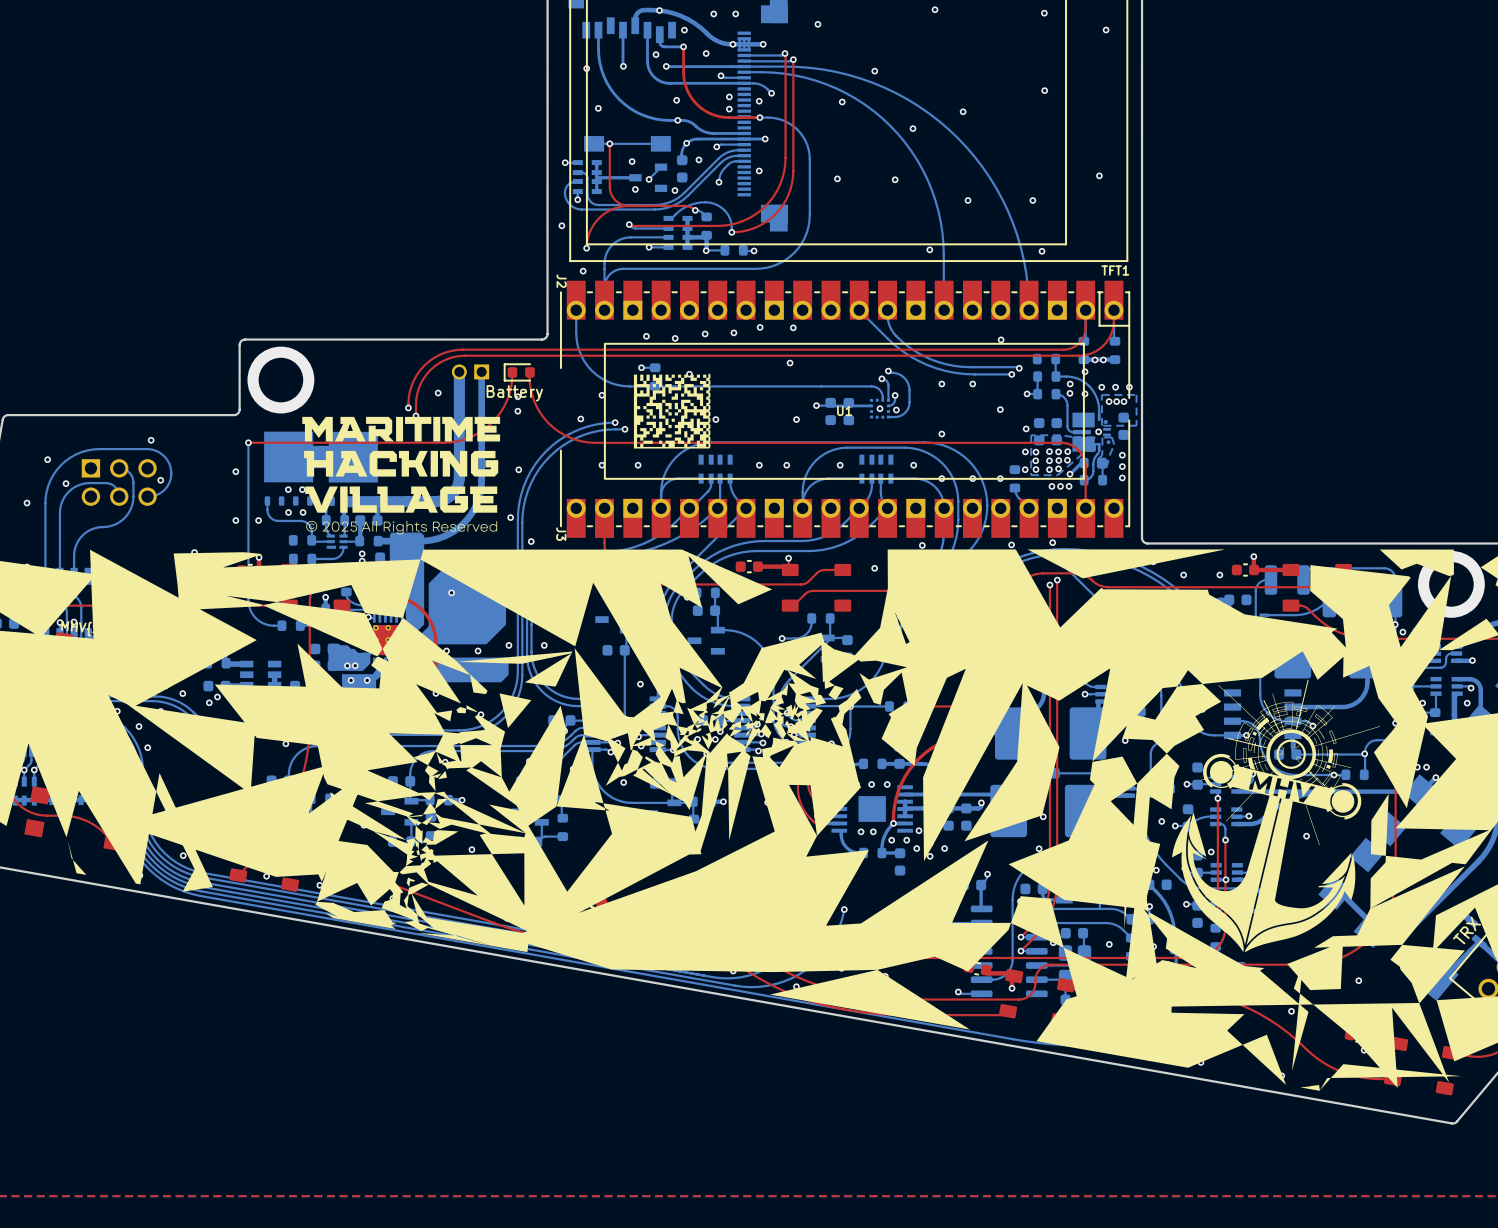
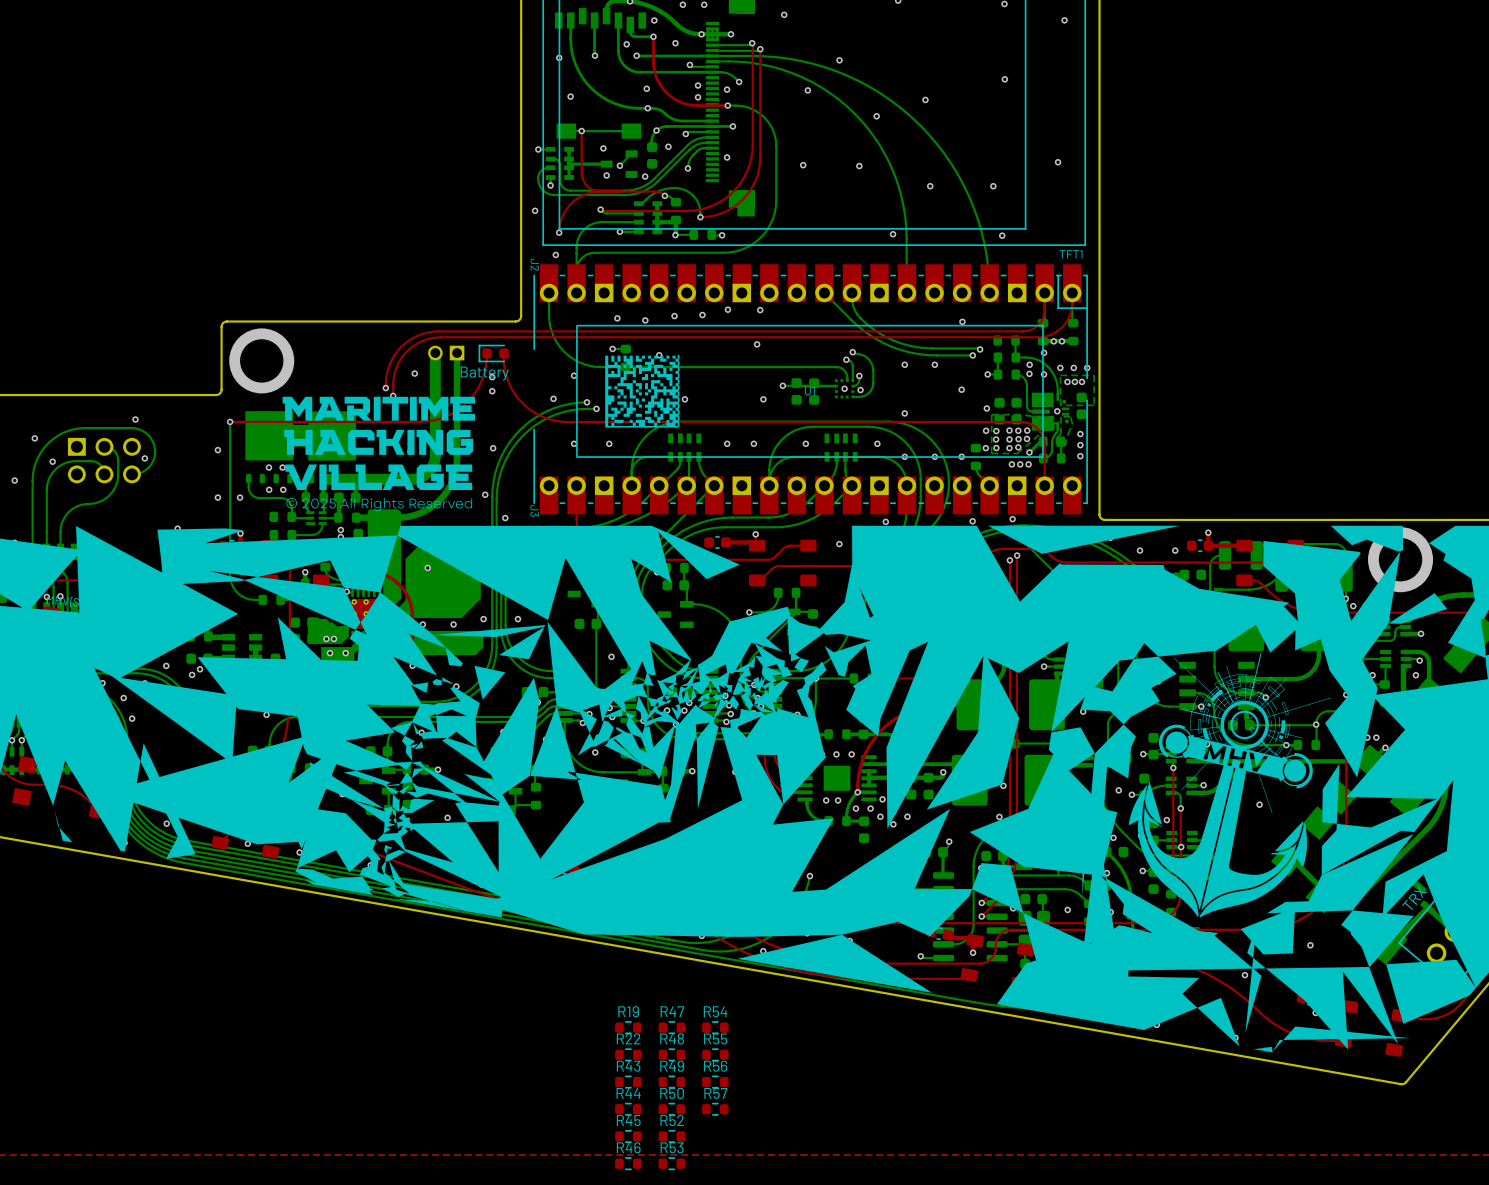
R19: none -> (628, 1027)
R47: none -> (671, 1027)
R54: none -> (715, 1027)
R22: none -> (628, 1054)
R48: none -> (671, 1054)
R55: none -> (715, 1054)
R43: none -> (628, 1082)
R49: none -> (671, 1082)
R56: none -> (715, 1082)
R44: none -> (628, 1109)
R50: none -> (671, 1109)
R57: none -> (715, 1109)
R45: none -> (628, 1136)
R52: none -> (671, 1136)
R46: none -> (628, 1163)
R53: none -> (671, 1163)

